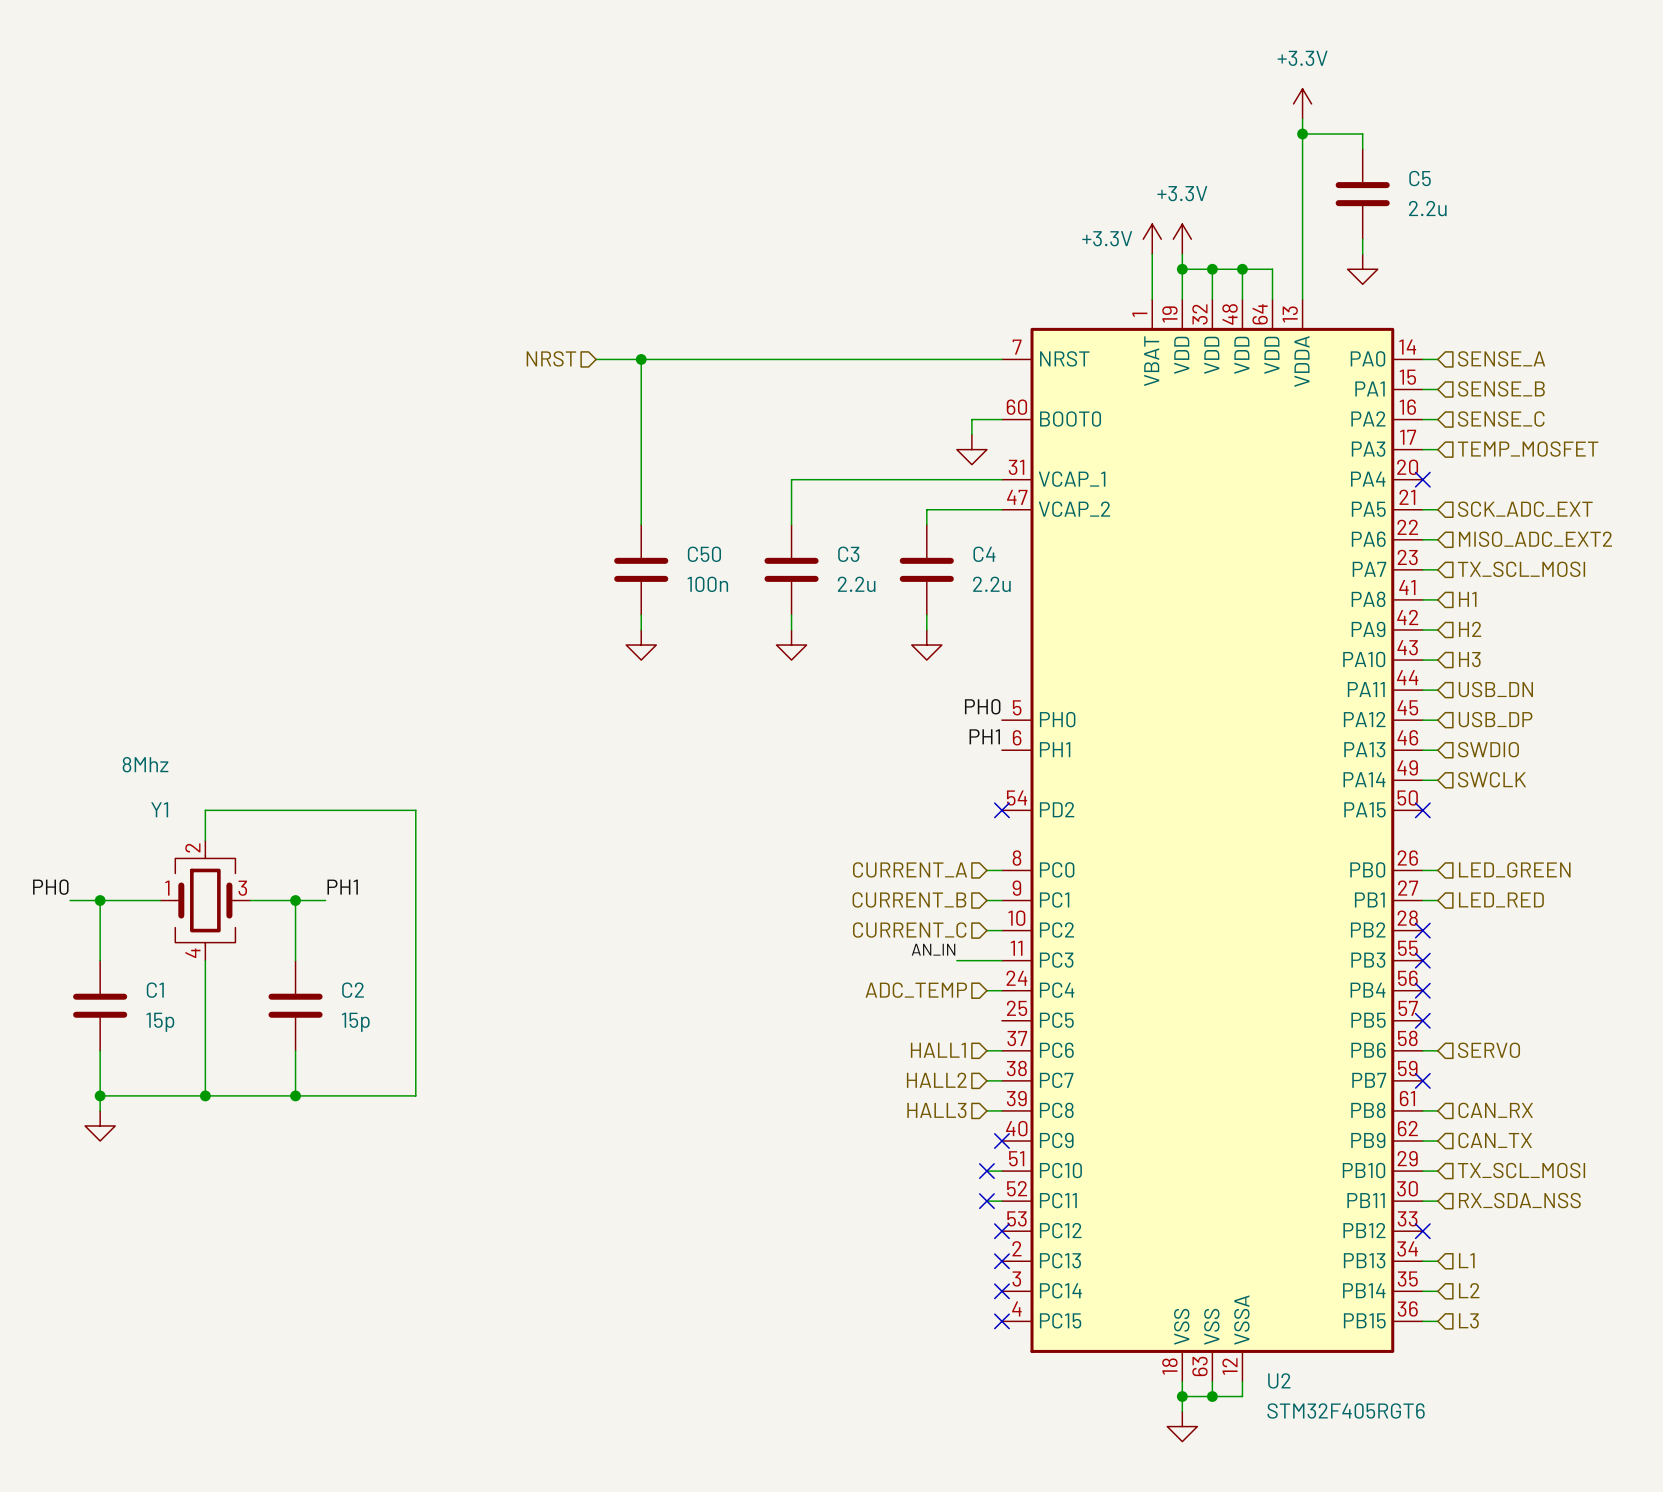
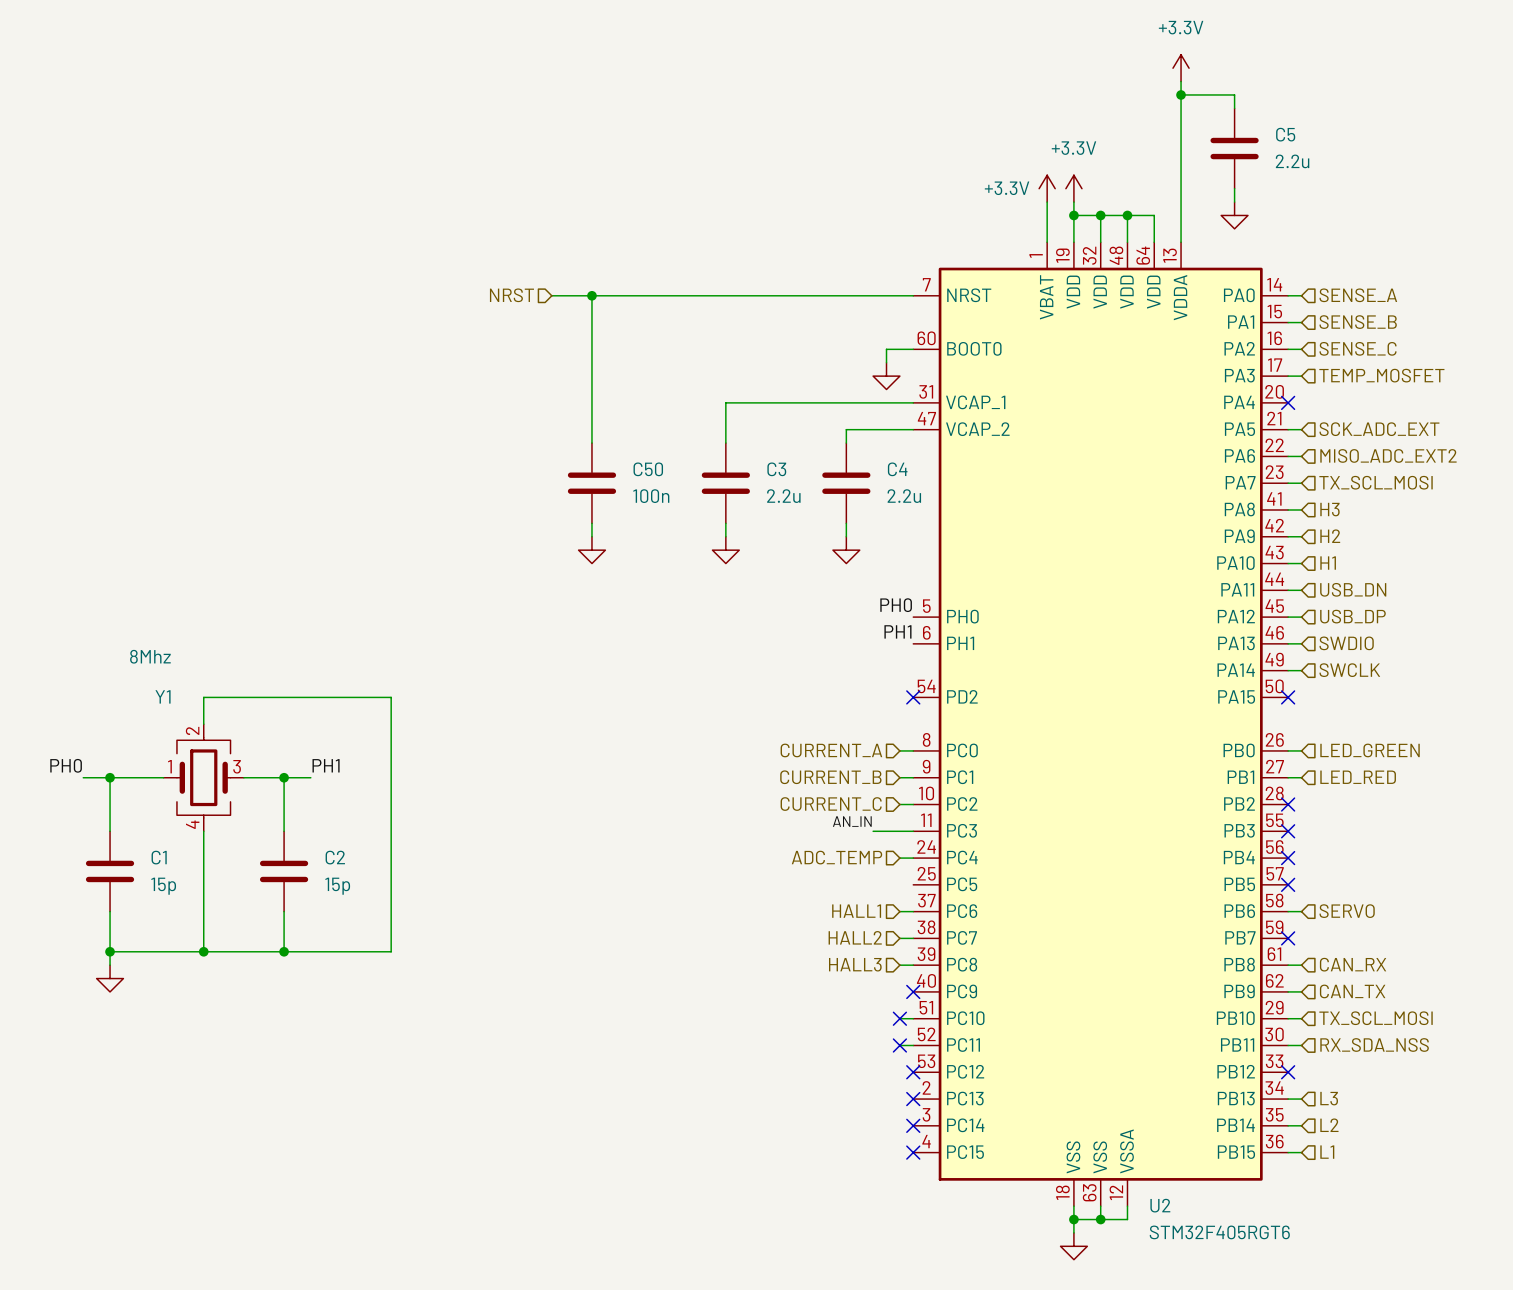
hierarchical label: H1 (1467, 599) -> H3 (1329, 509)
hierarchical label: H3 (1469, 659) -> H1 (1328, 563)
hierarchical label: L1 (1466, 1260) -> L3 (1329, 1098)
hierarchical label: L3 (1468, 1320) -> L1 (1327, 1152)

